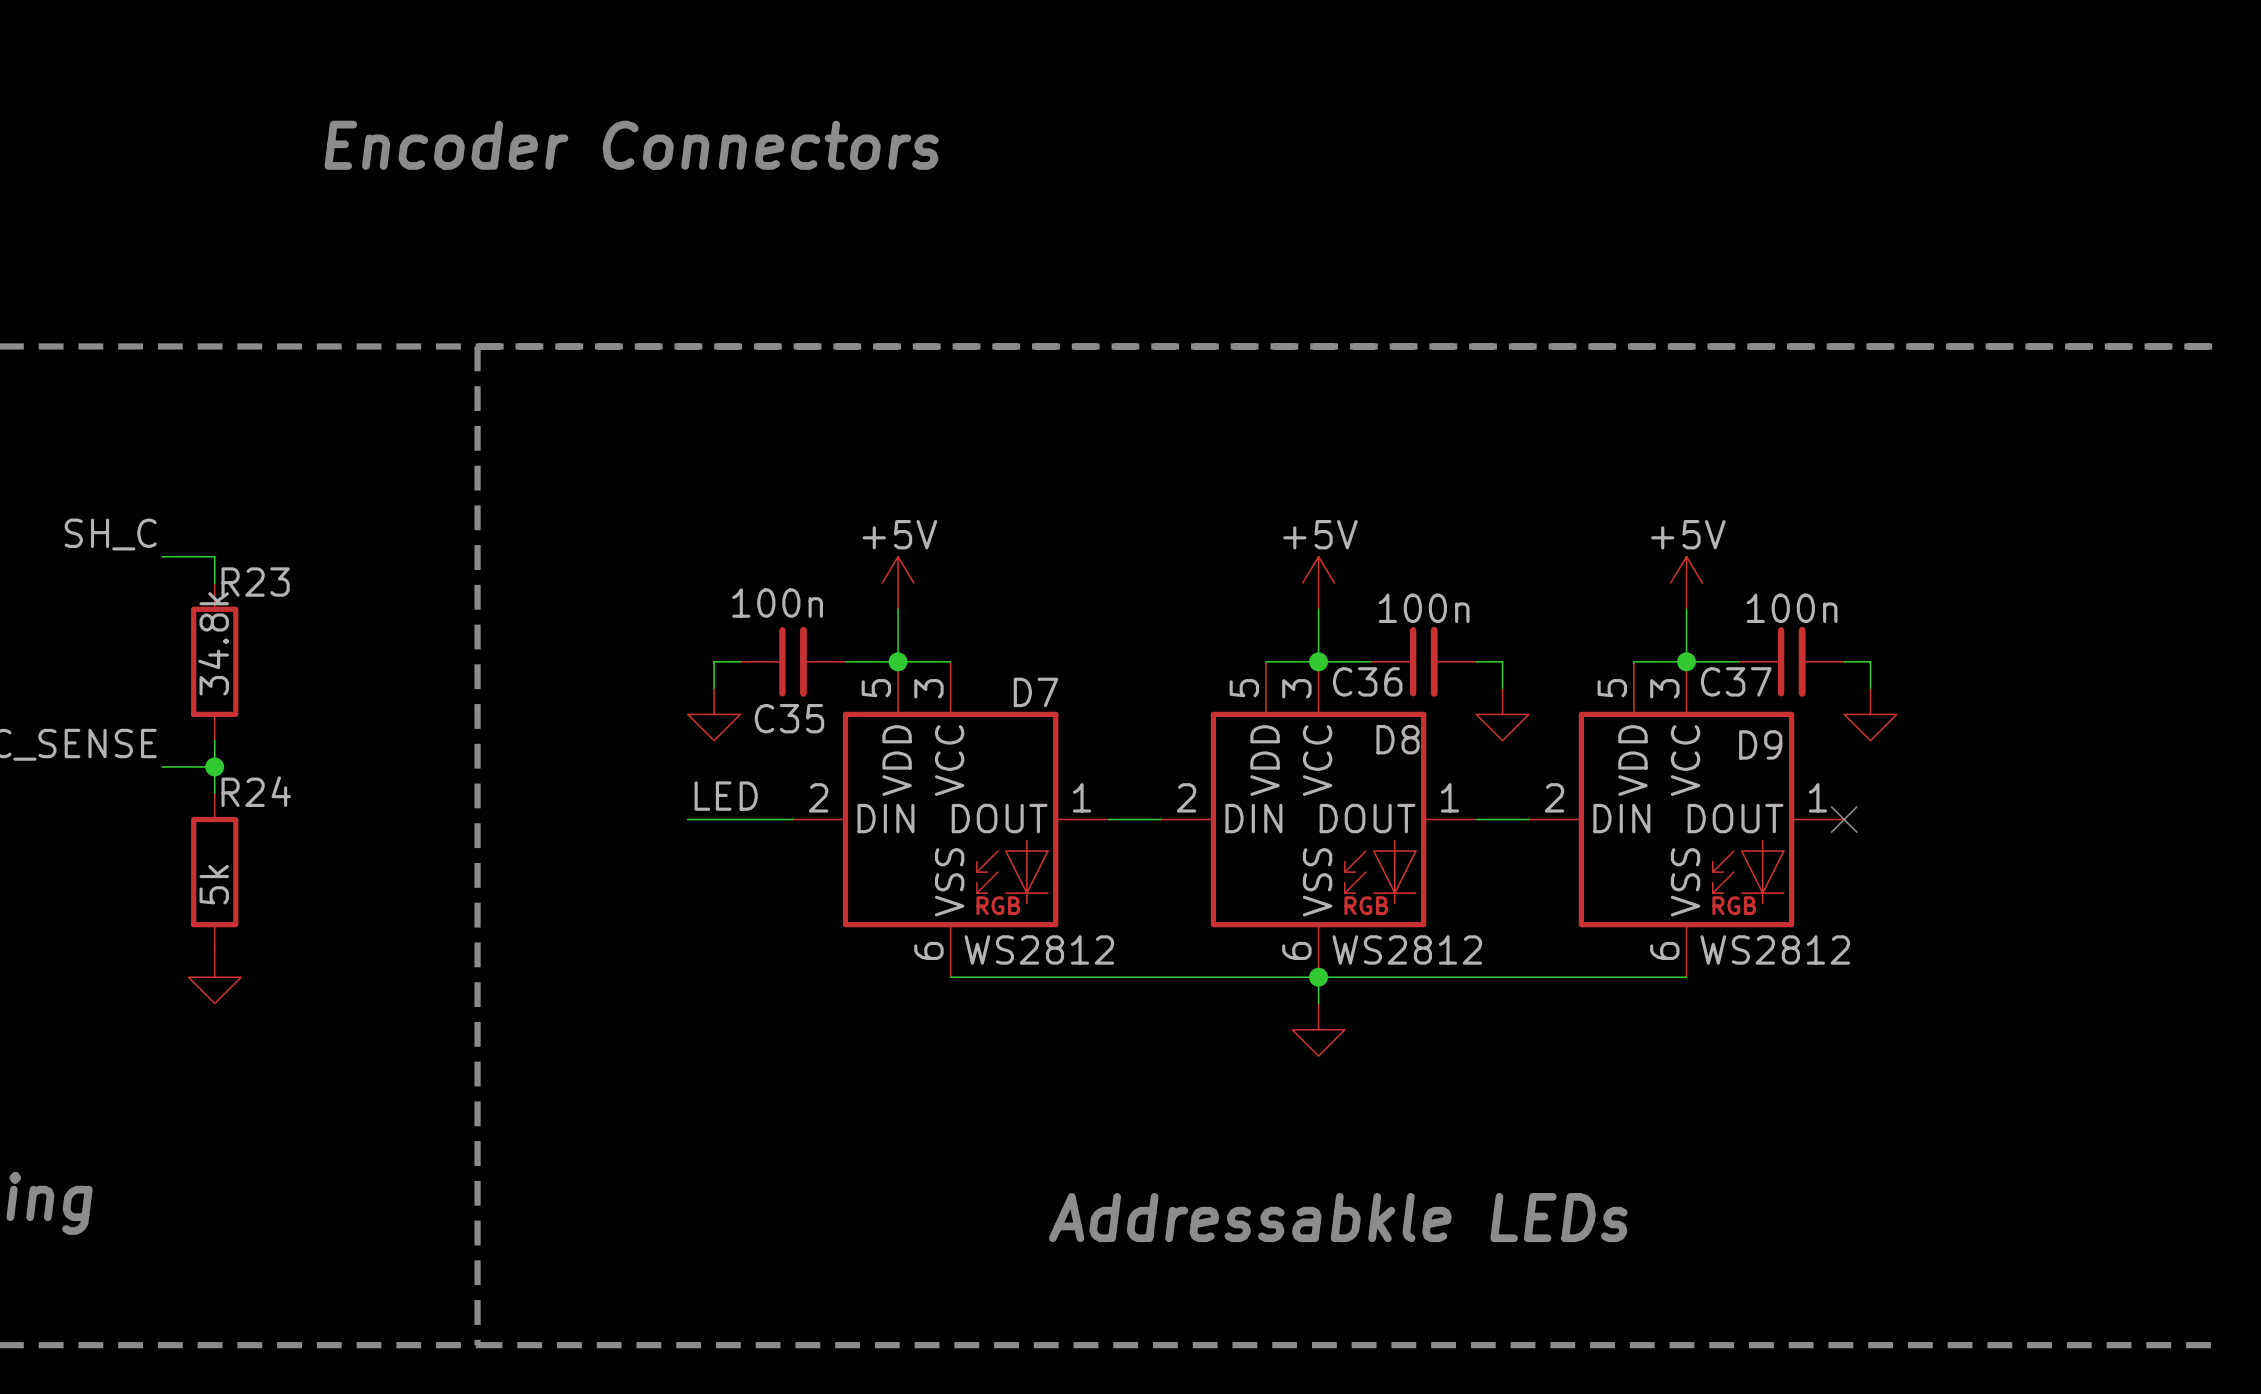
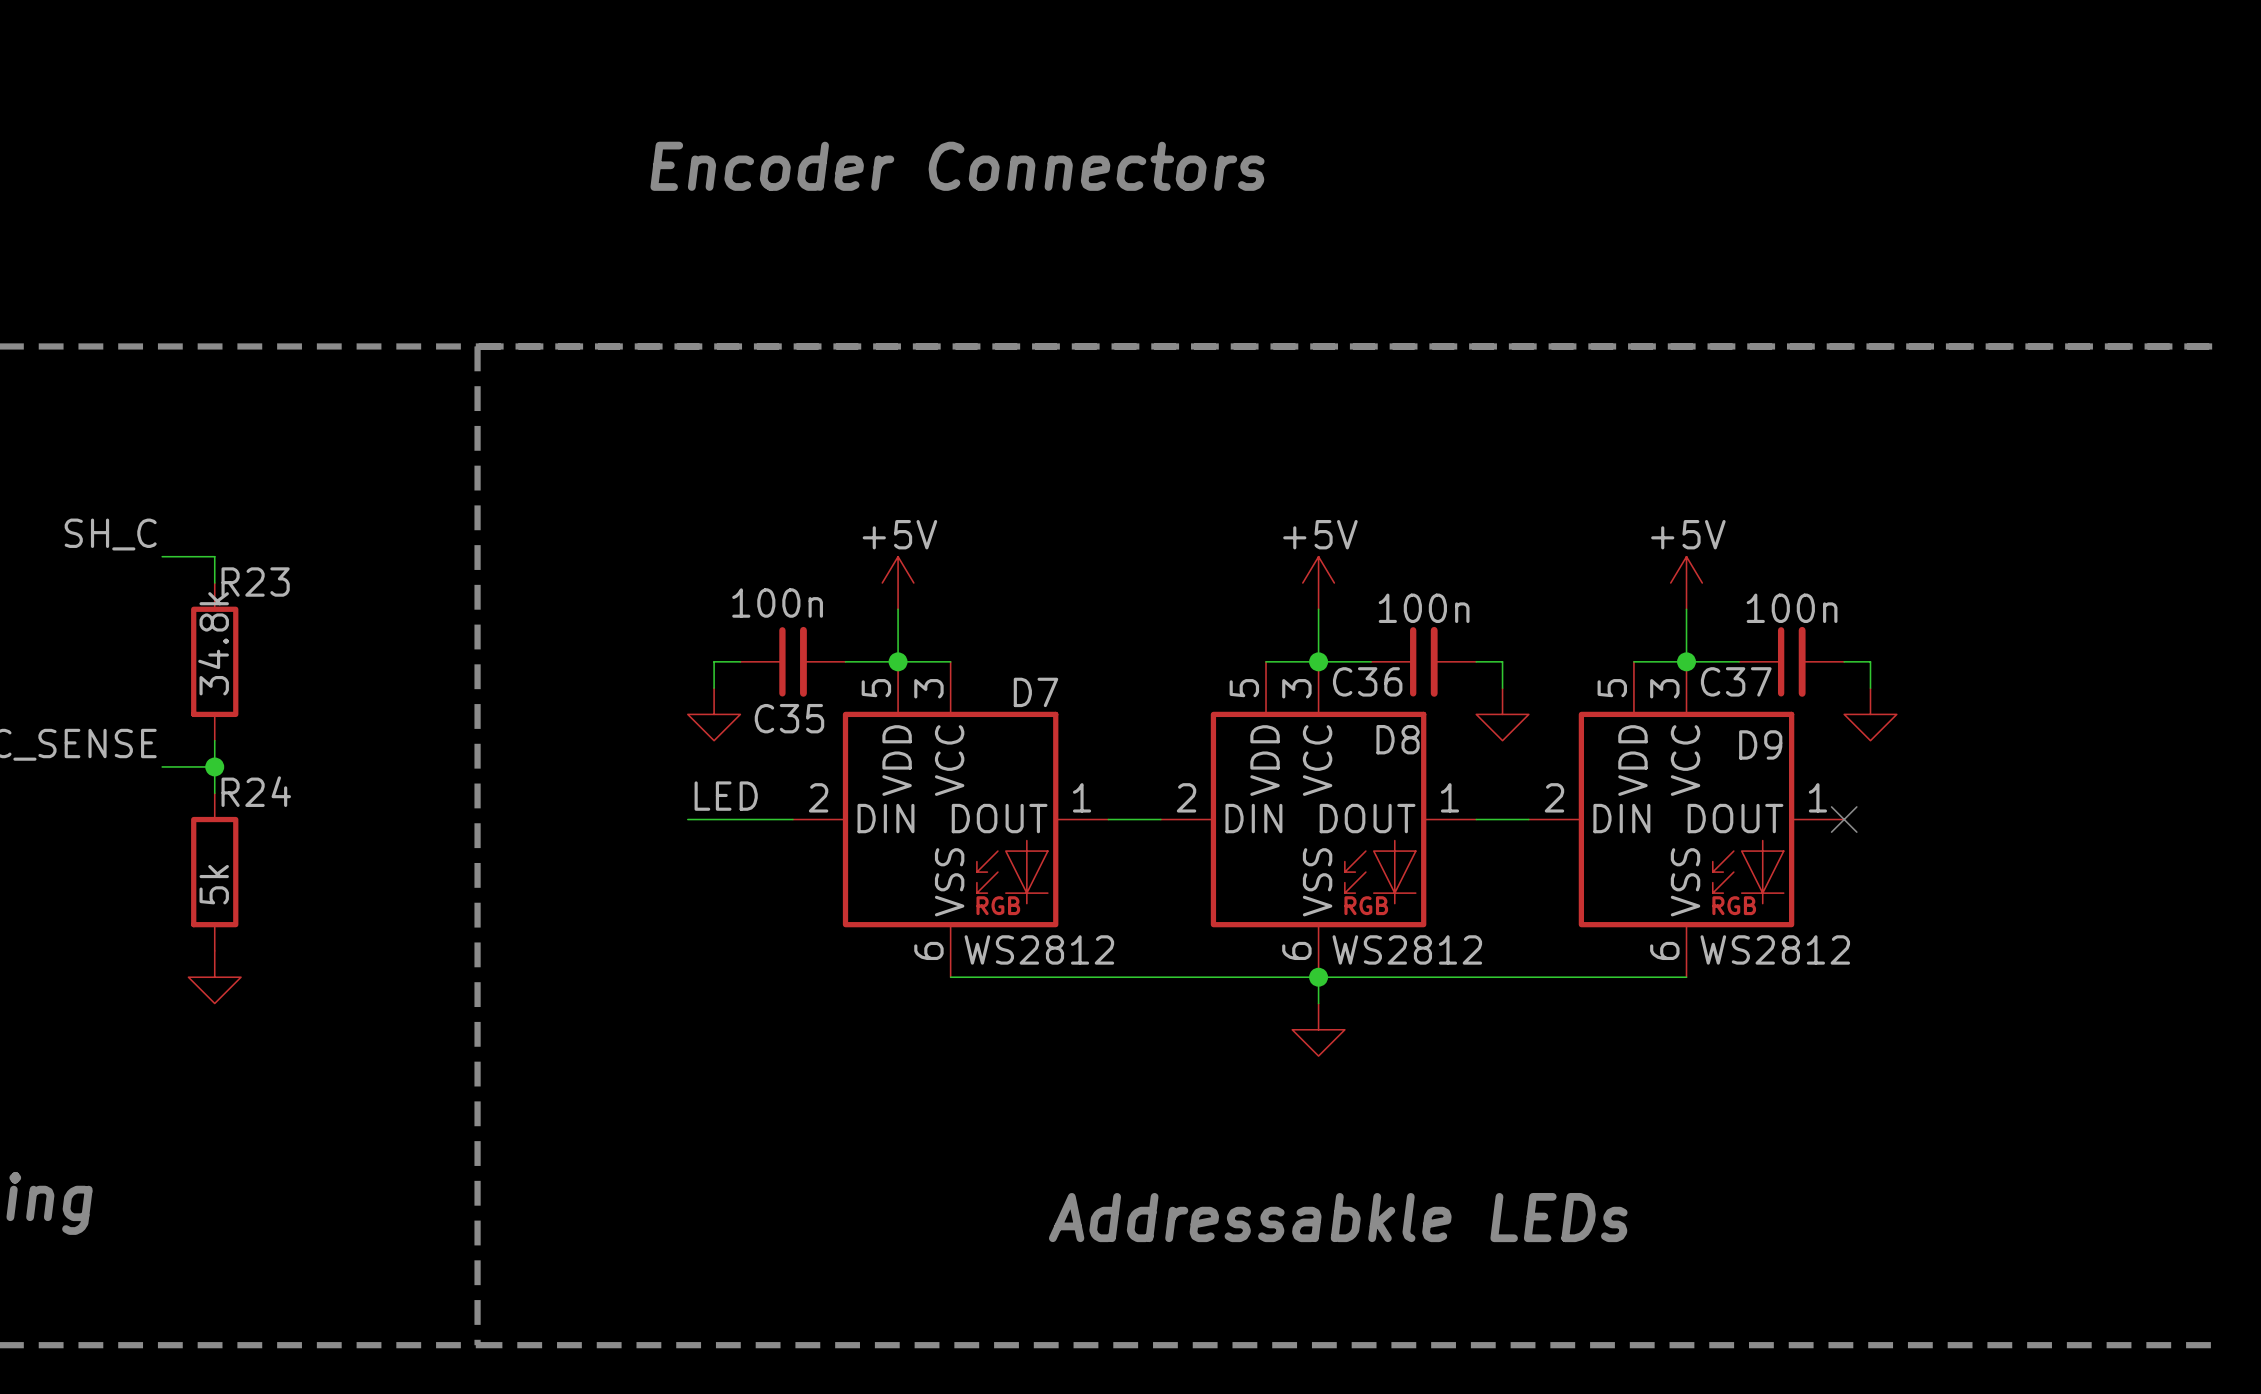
text position: Encoder Connectors (631, 145) -> Encoder Connectors (957, 166)

